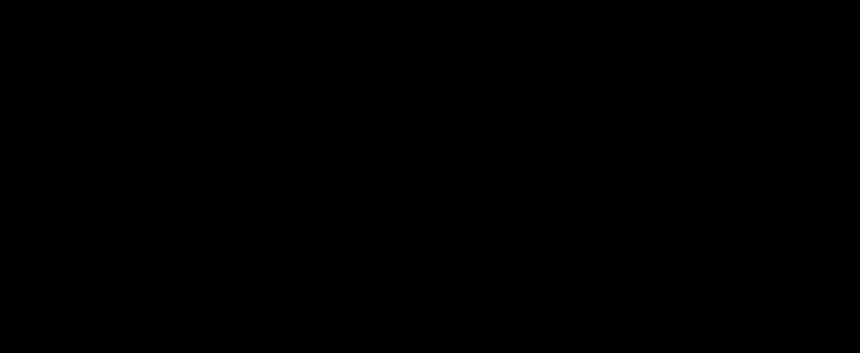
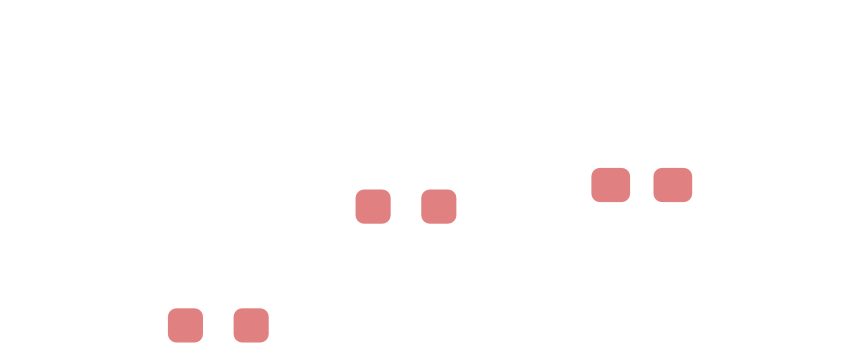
part: none -> (641, 185)
part: none -> (405, 206)
part: none -> (218, 325)

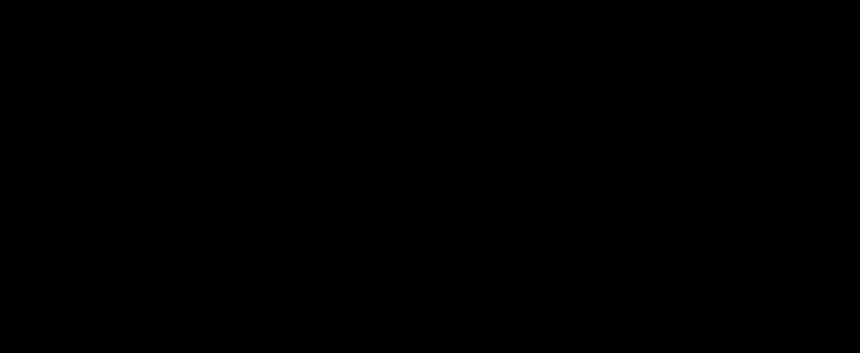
part: (641, 185) -> none
part: (405, 206) -> none
part: (218, 325) -> none

